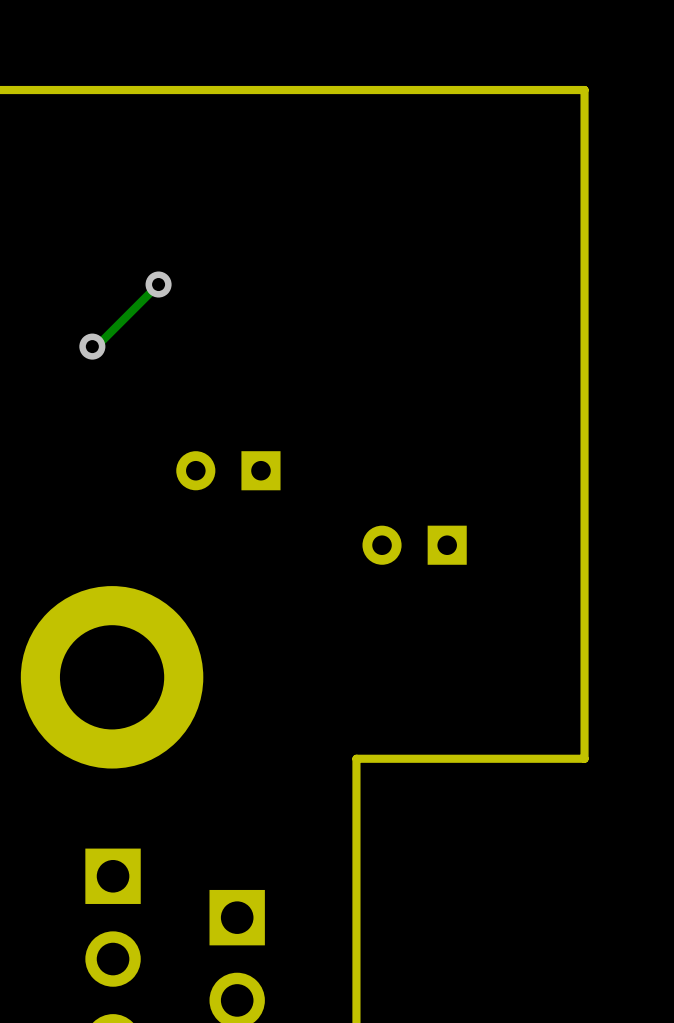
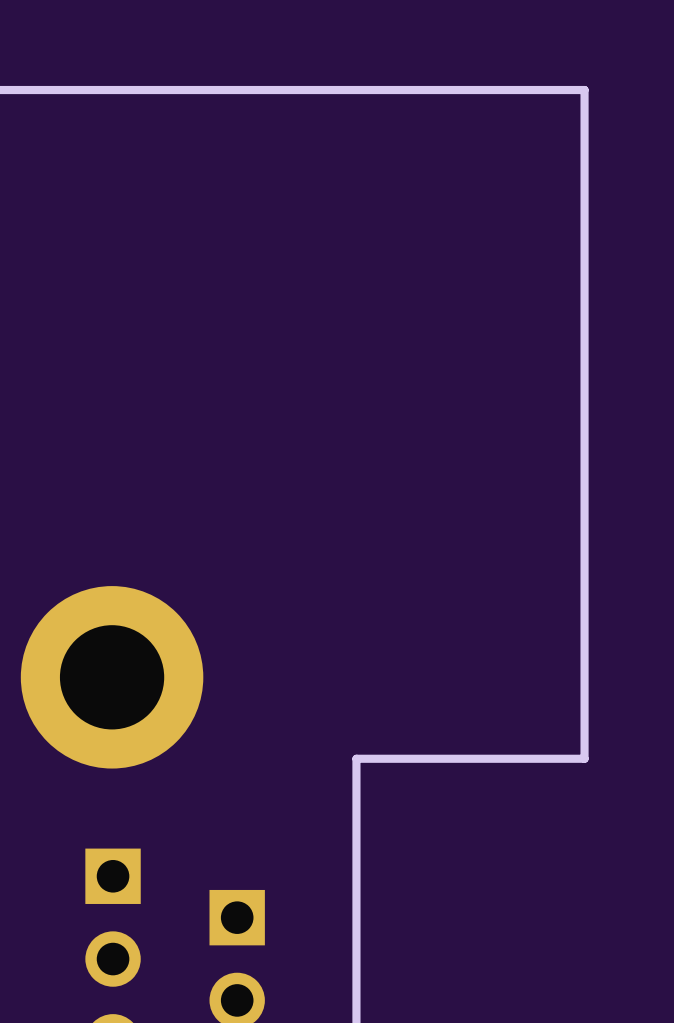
track: (158, 284) (96, 346) (92, 346) -> none
via: (158, 284) -> none
via: (92, 346) -> none
part: (228, 470) -> none
part: (414, 545) -> none

